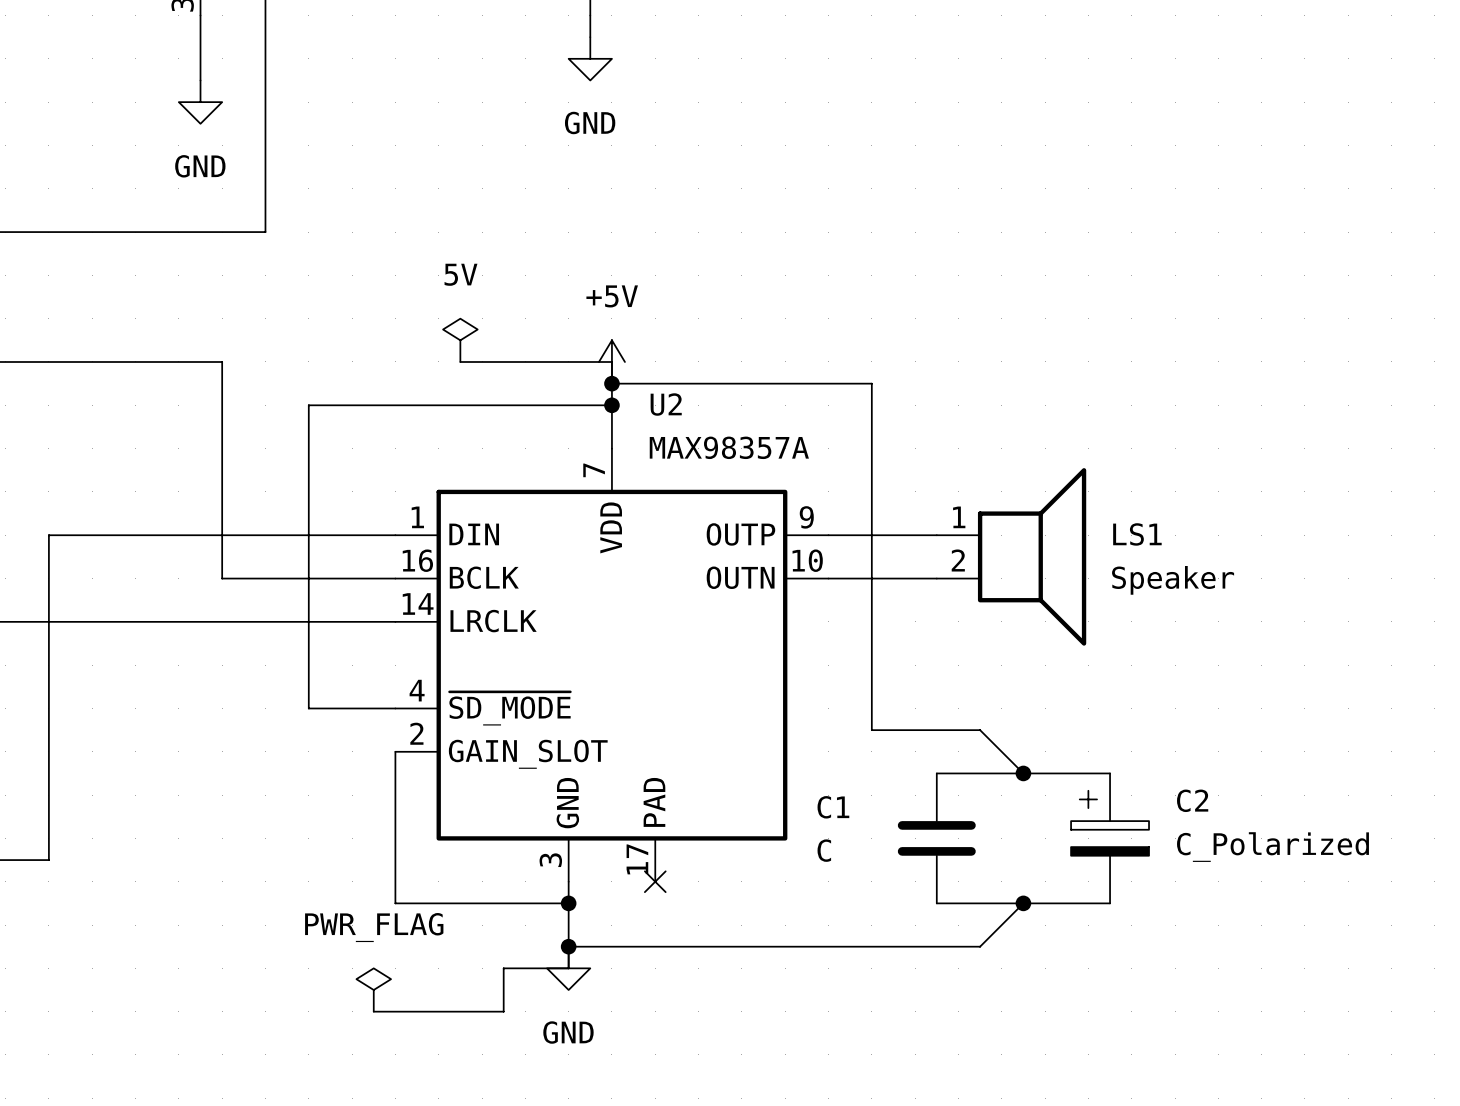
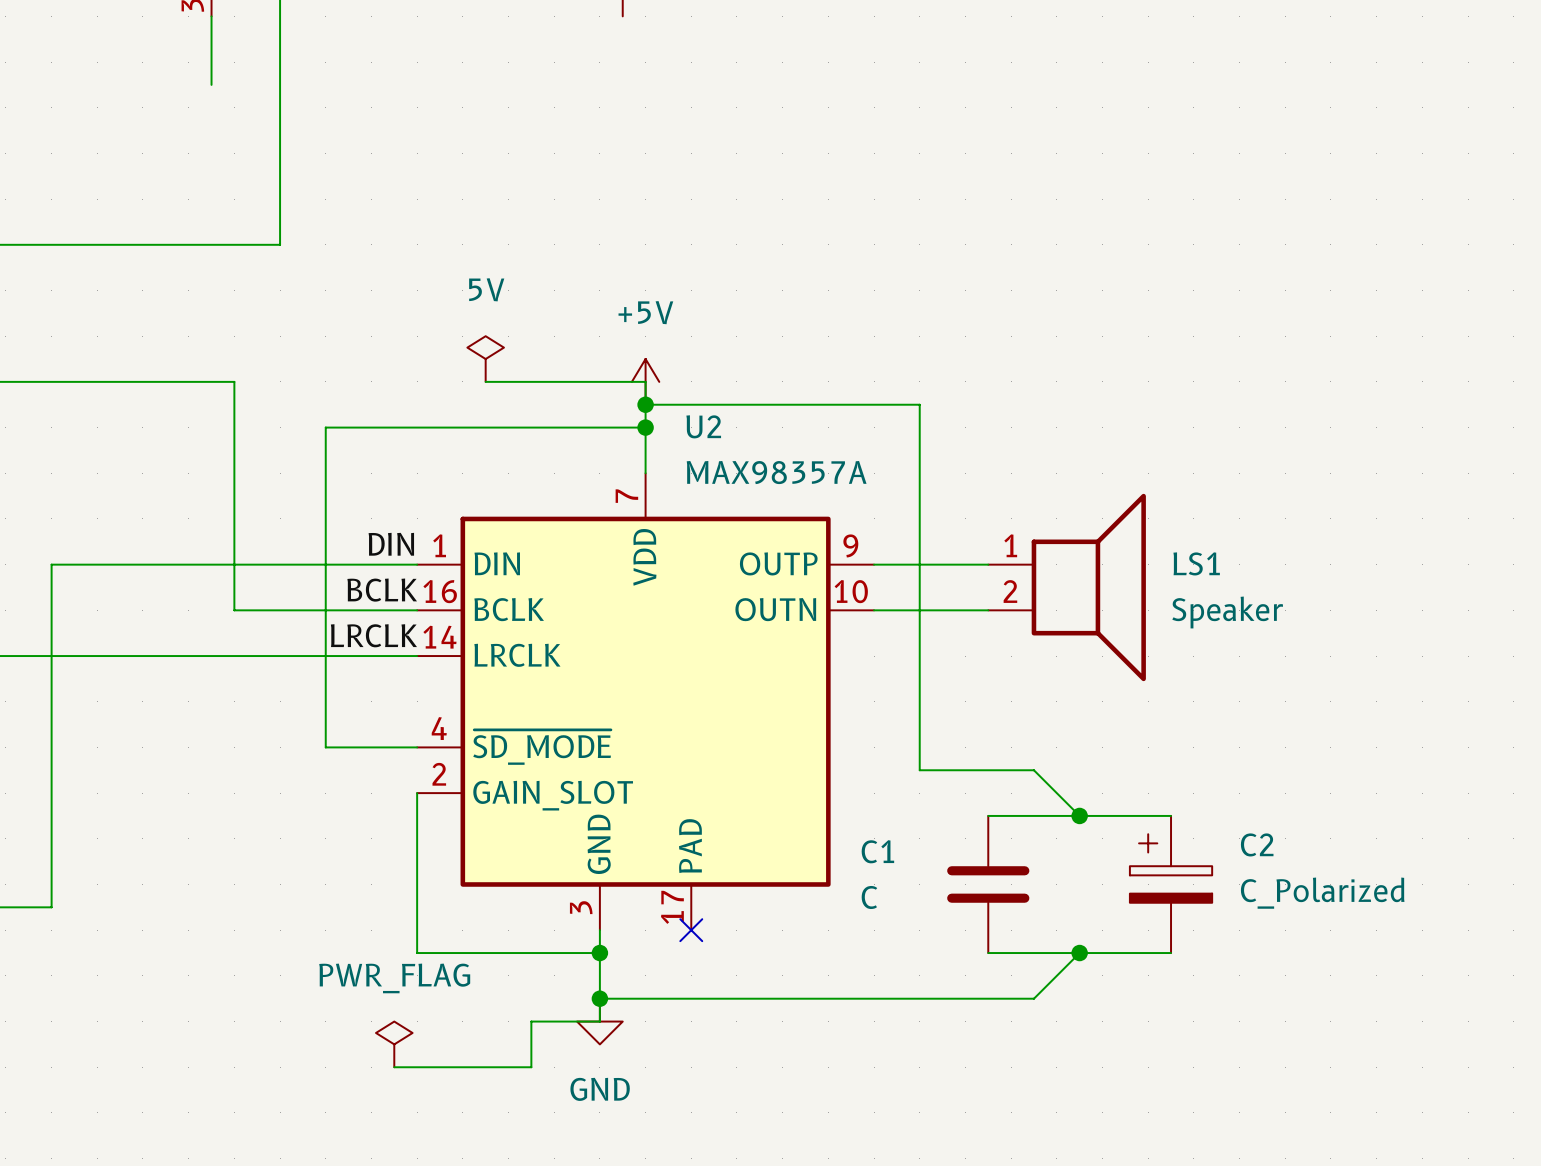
wire: (590, 15) (590, 37) -> none
power symbol: GND (590, 58) -> none
power symbol: GND (200, 102) -> none
label: none -> DIN (391, 544)
label: none -> BCLK (382, 590)
label: none -> LRCLK (373, 635)

